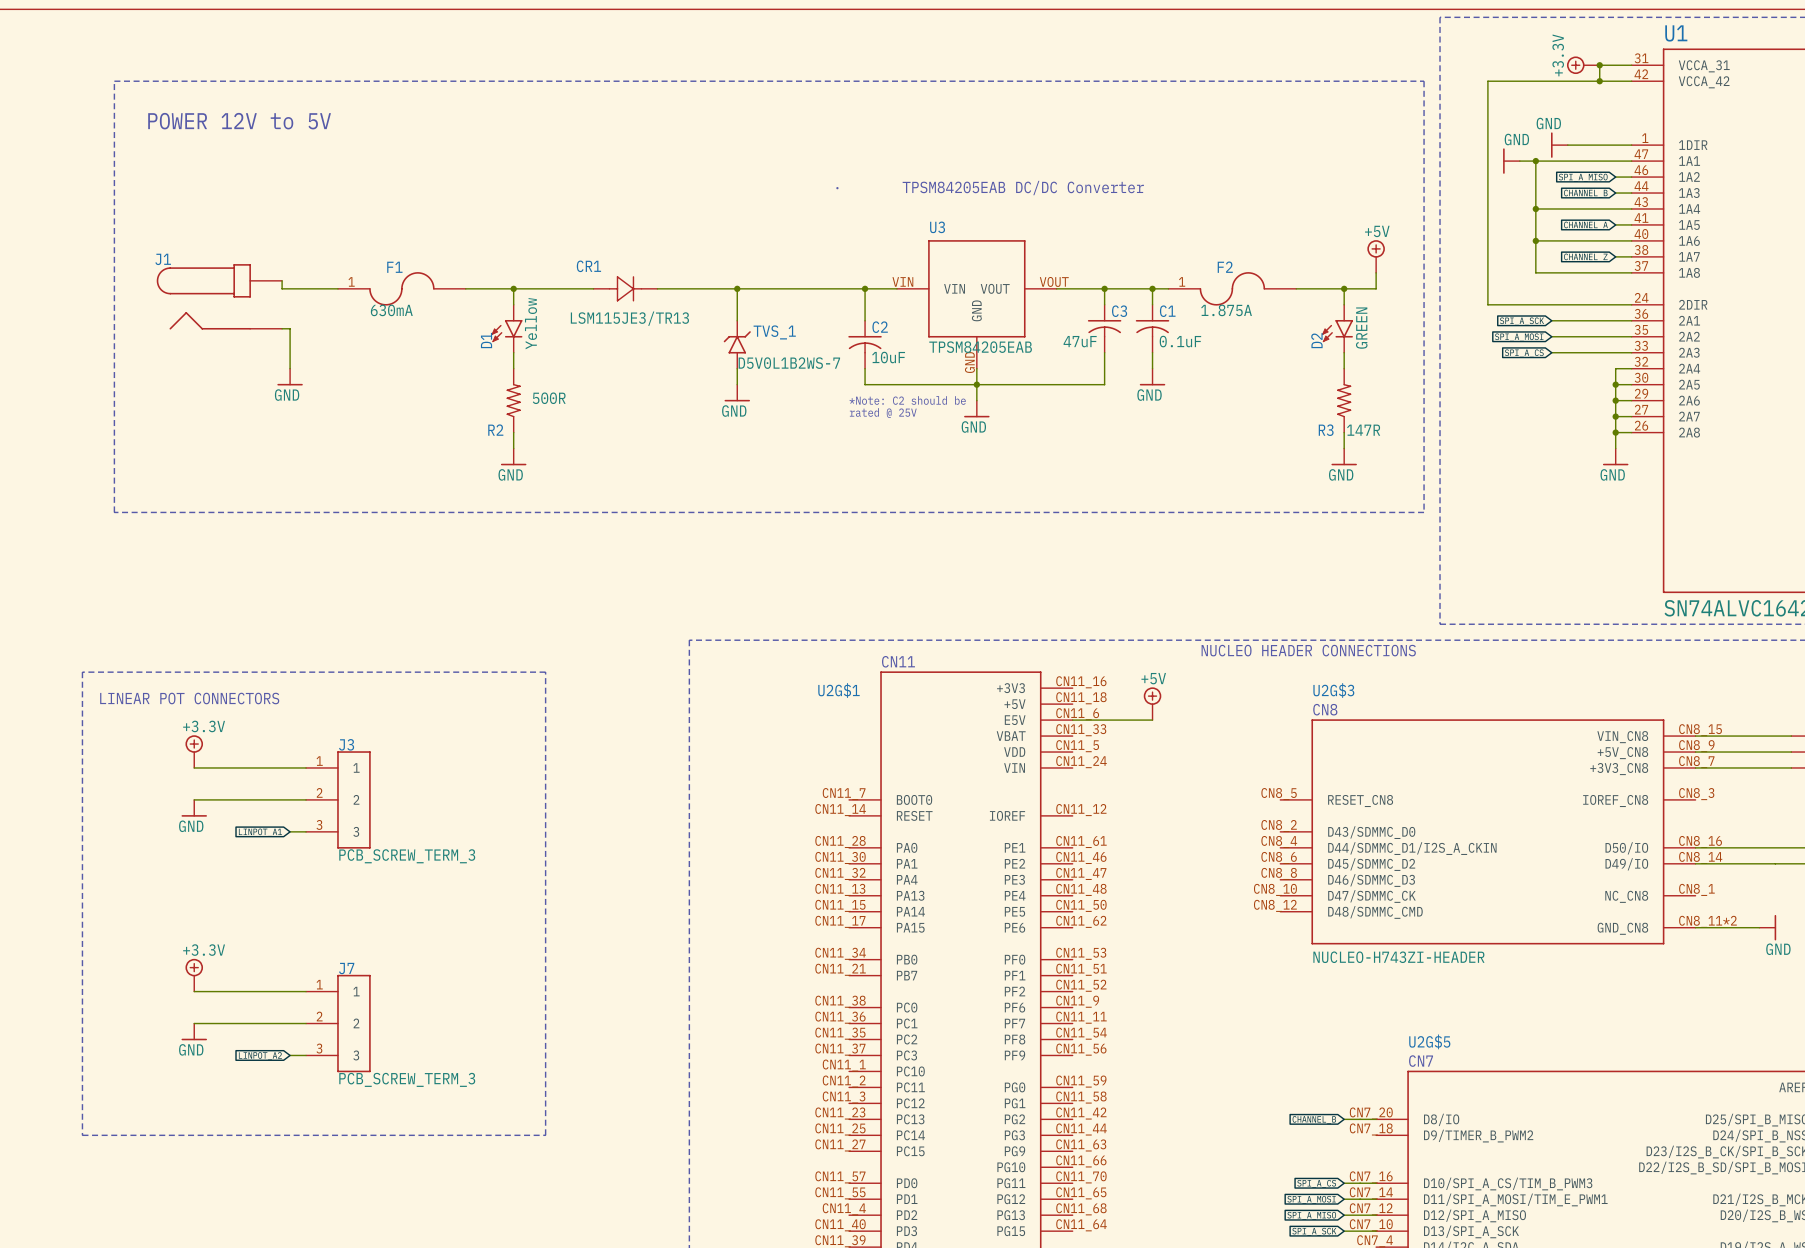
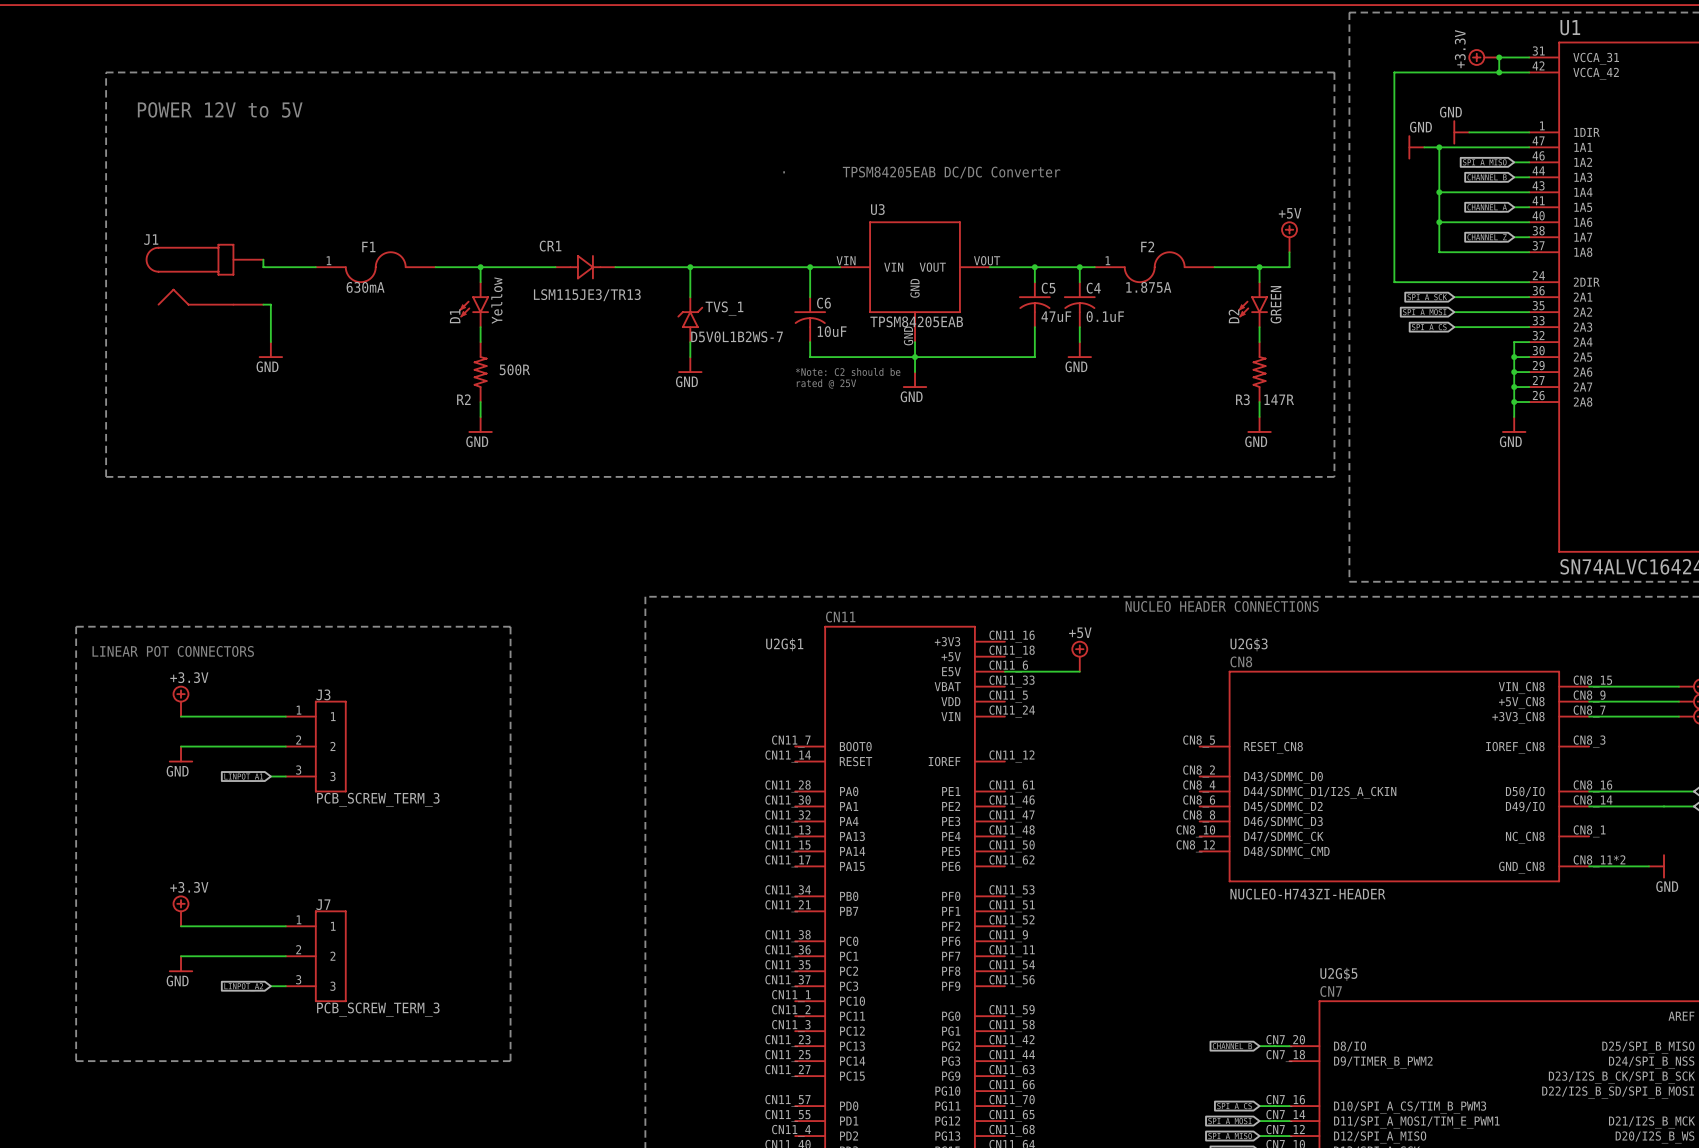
C3 name: C3 (1119, 311) -> C5 (1048, 288)
C1 name: C1 (1167, 311) -> C4 (1093, 288)
C2 name: C2 (880, 327) -> C6 (823, 303)
C3 value position: 47uF (1080, 341) -> 47uF (1056, 316)

